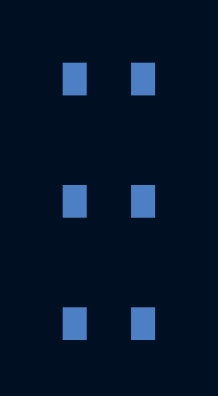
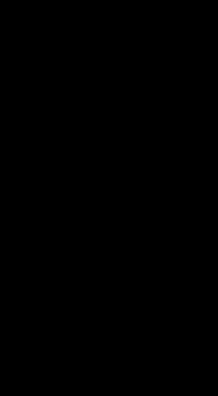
part: (108, 79) -> none
part: (108, 201) -> none
part: (108, 323) -> none

